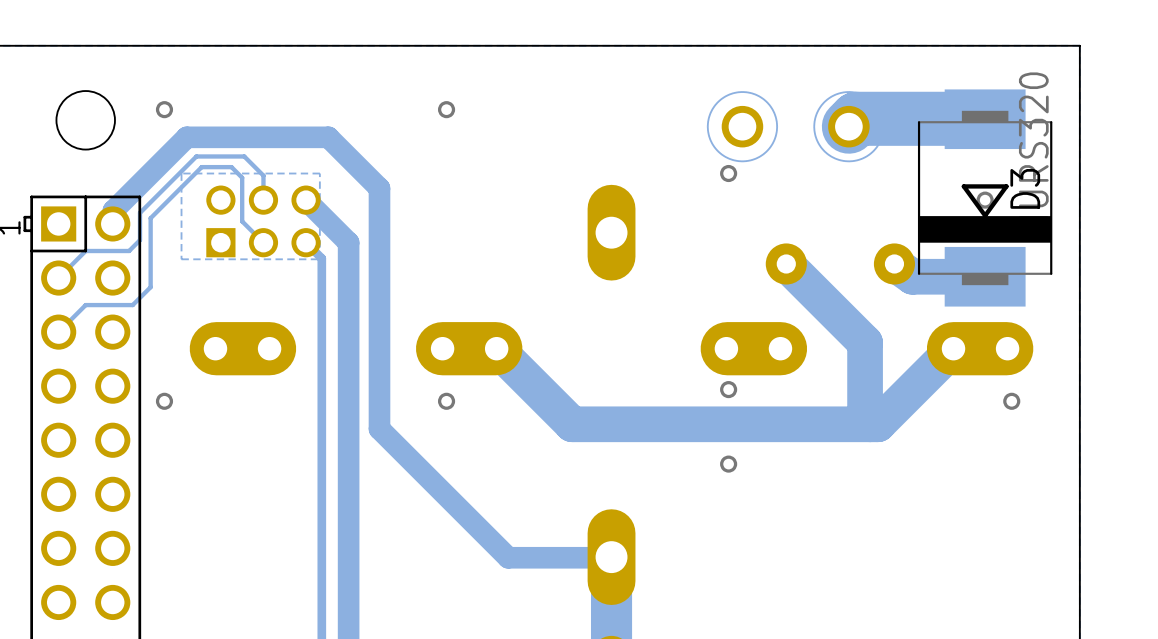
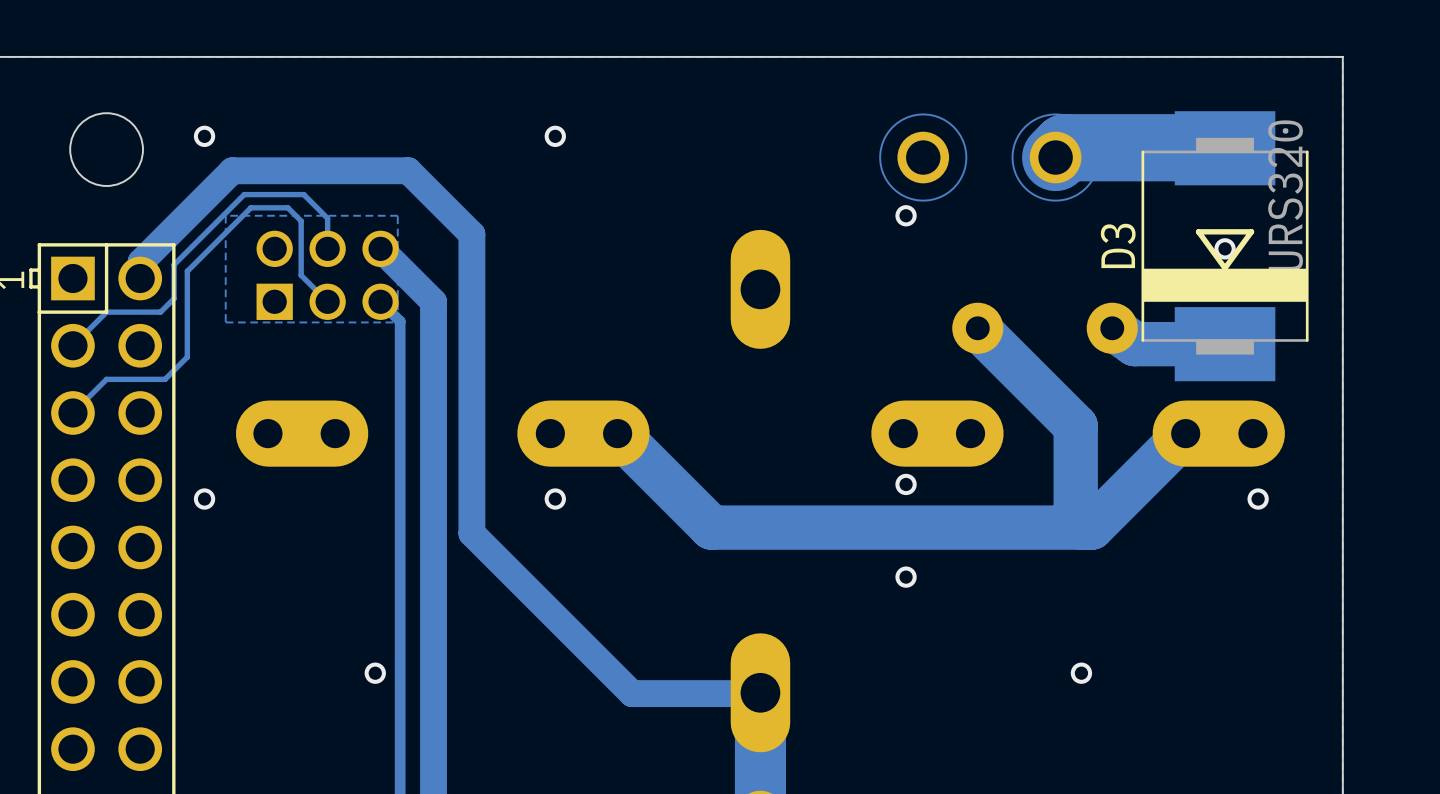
D3 name position: D3 (1025, 188) -> D3 (1118, 245)
via: none -> (375, 673)
via: none -> (1081, 673)

